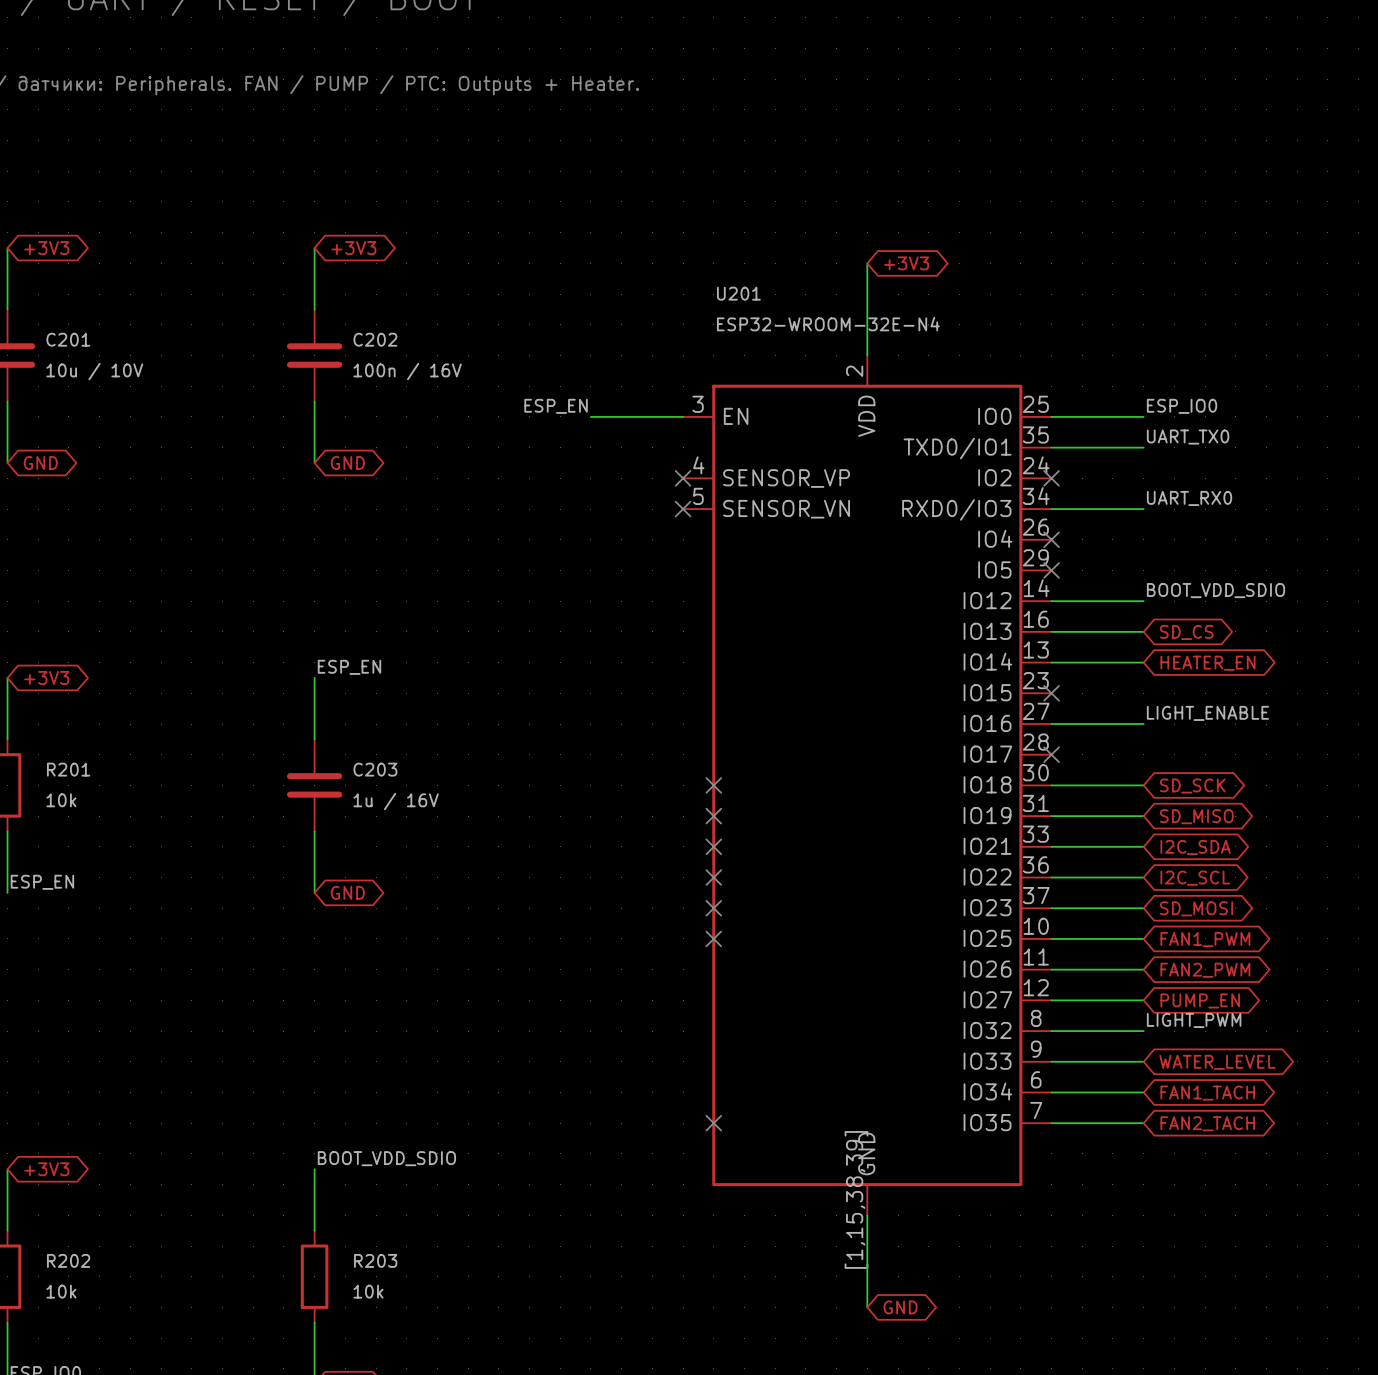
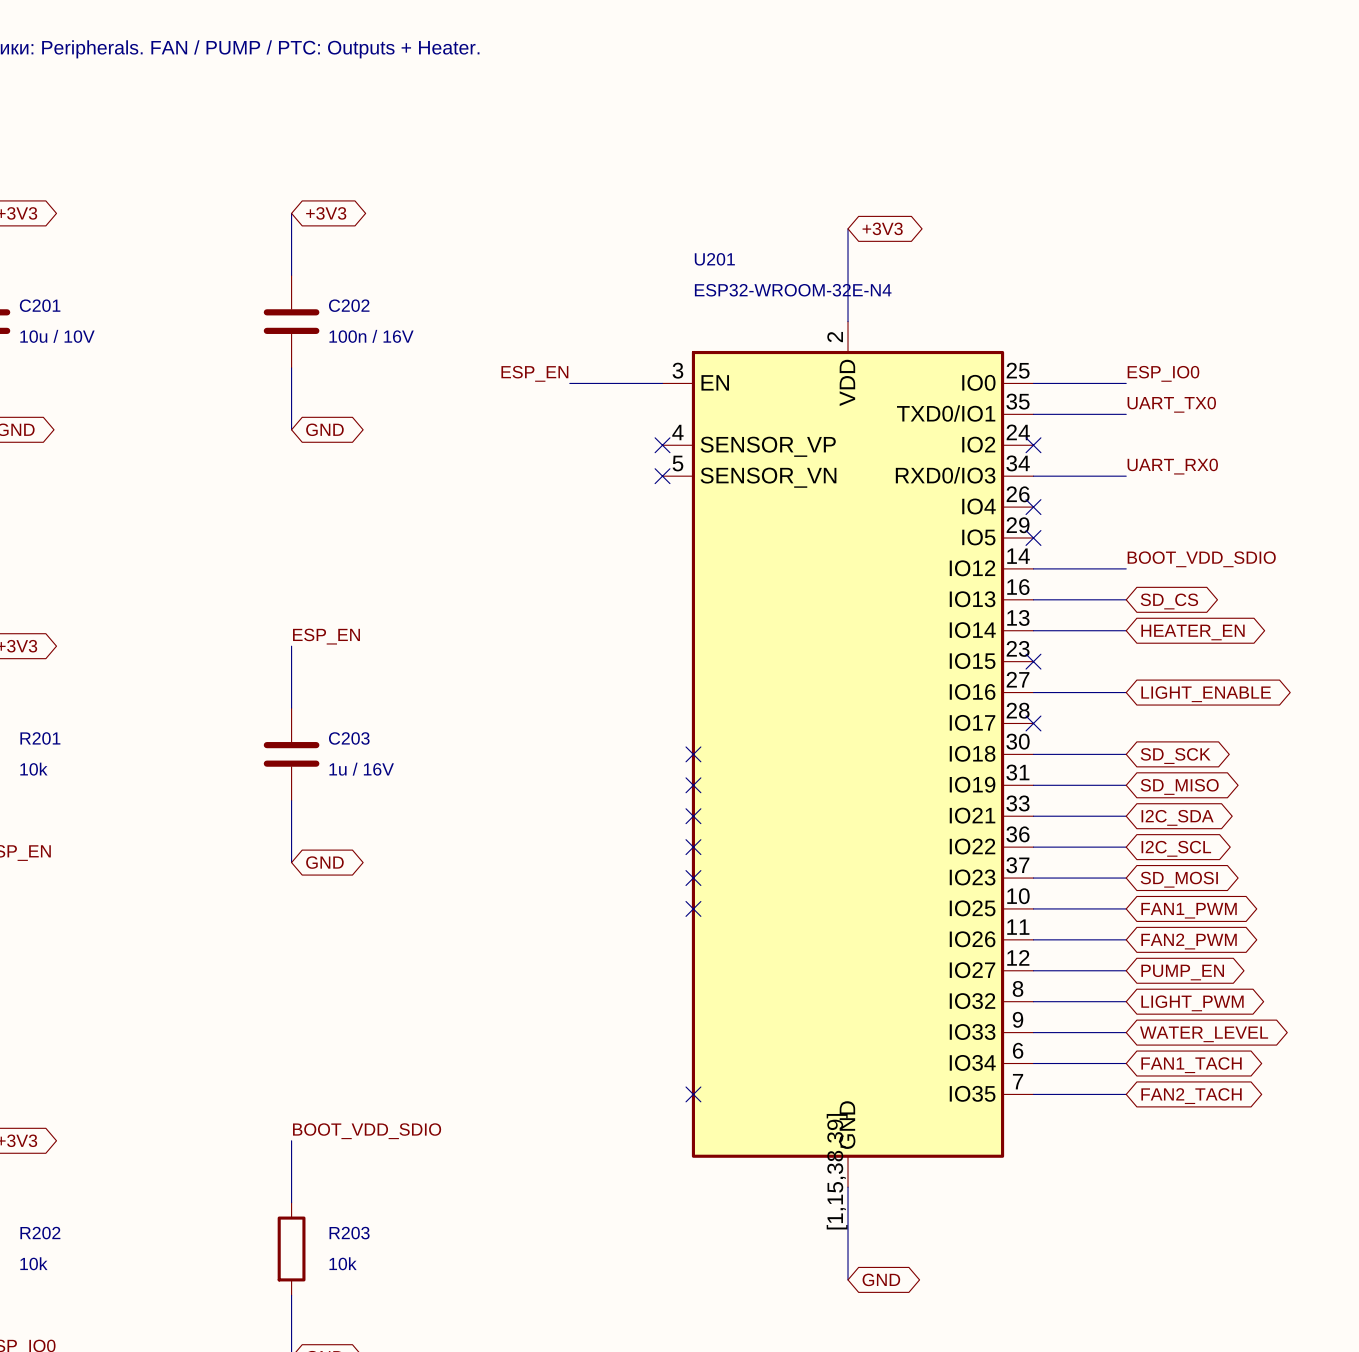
label: LIGHT_ENABLE (1207, 713) -> none
global label: none -> LIGHT_ENABLE (1206, 694)
label: LIGHT_PWM (1194, 1020) -> none
global label: none -> LIGHT_PWM (1192, 1003)

